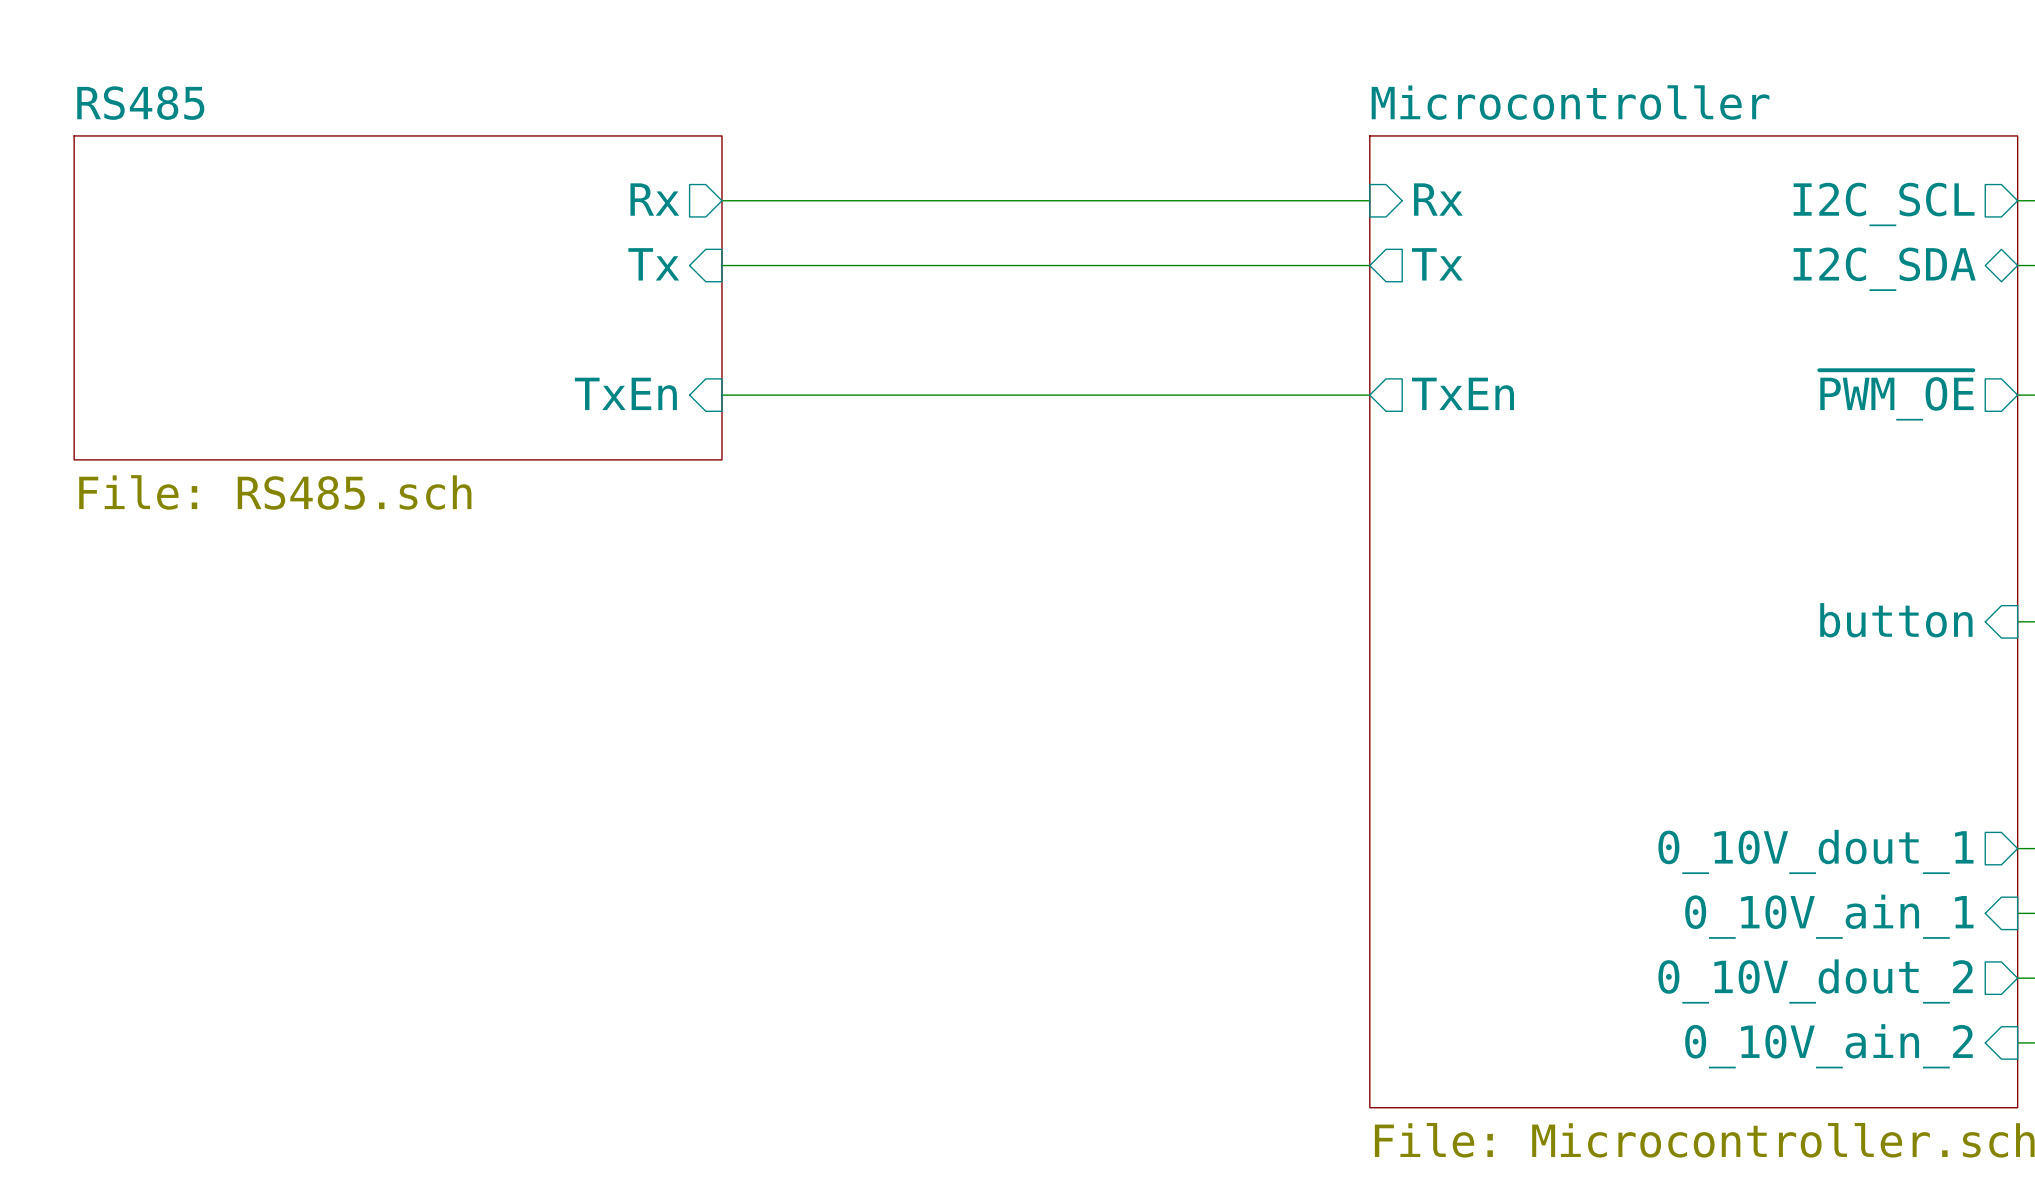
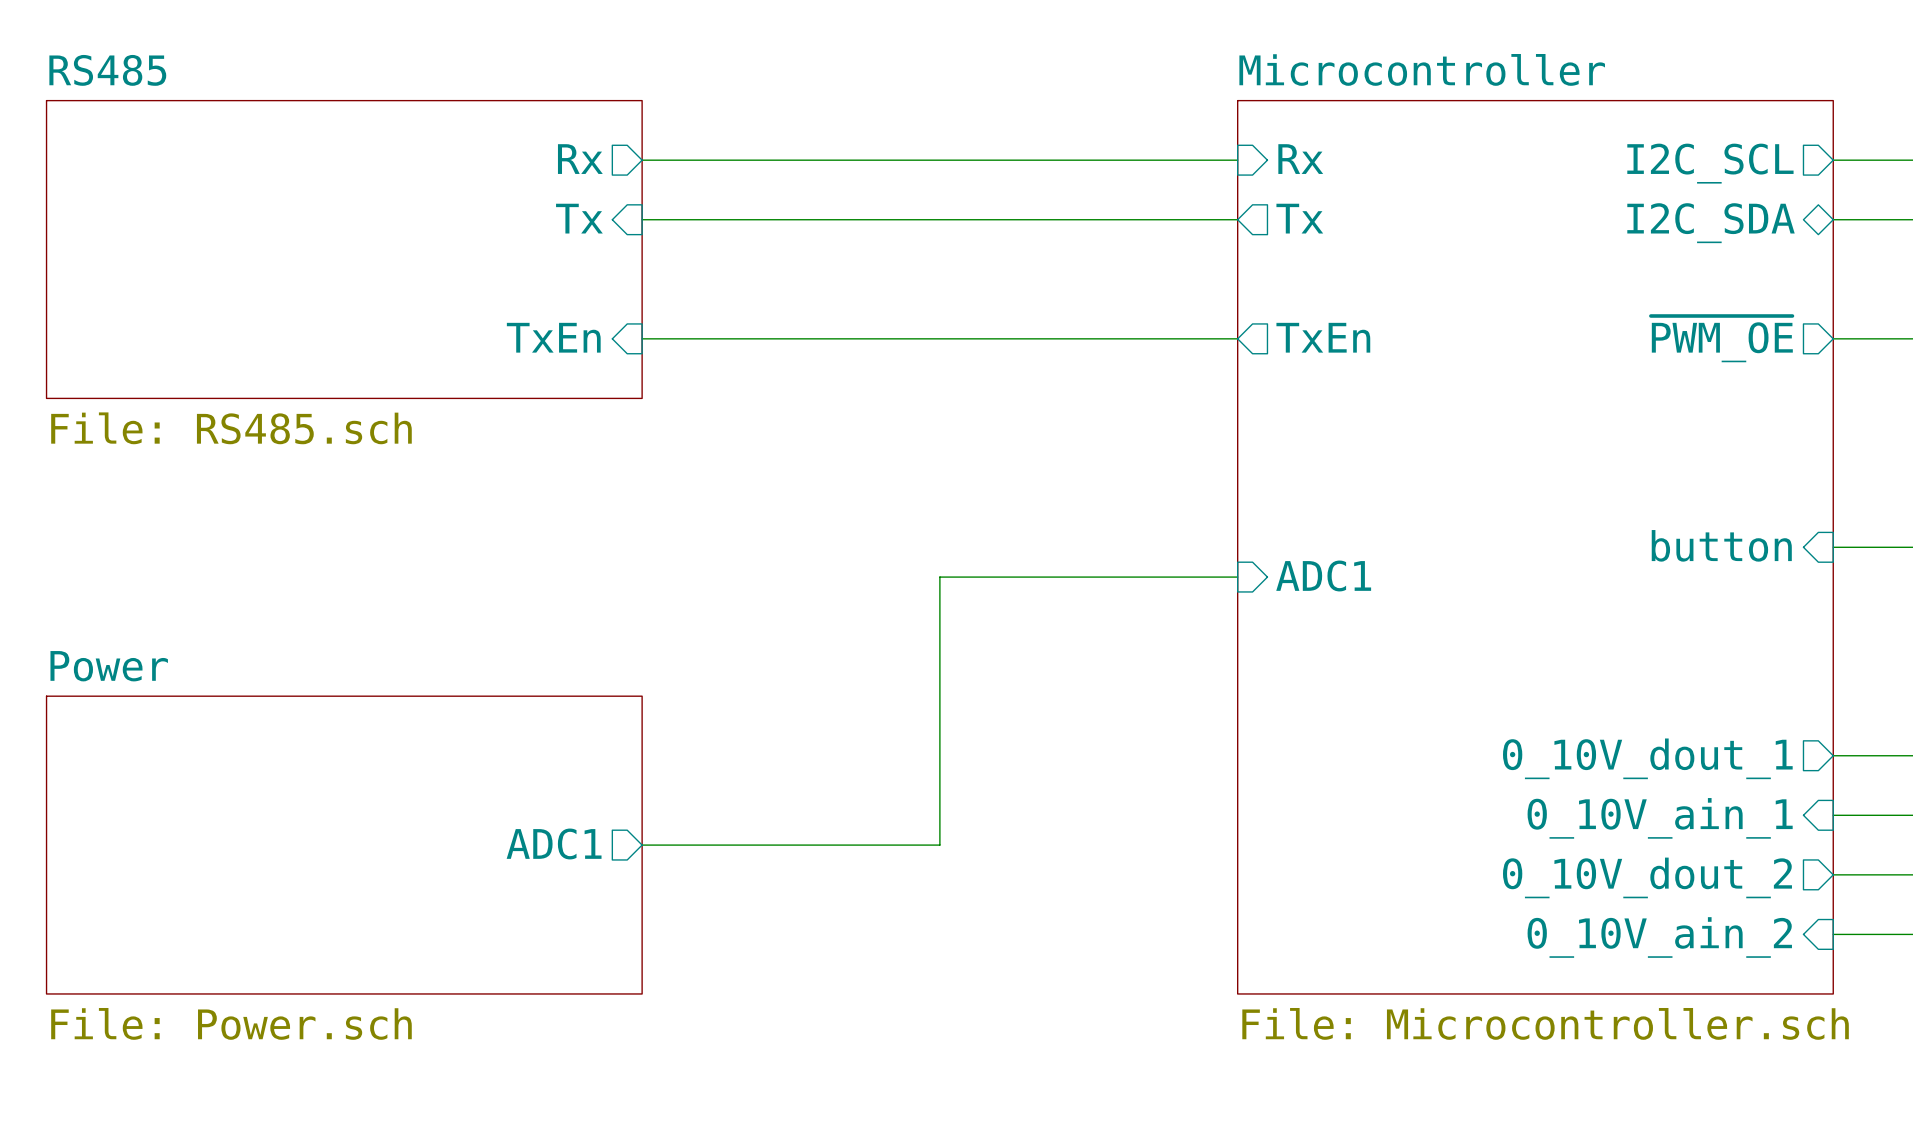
sheet pin: none -> ADC1 (1323, 575)
wire: none -> (1237, 577) (939, 577) (939, 845) (642, 845)
sheet pin: none -> ADC1 (554, 843)
sheet Power: none -> File: Power.sch (344, 845)

